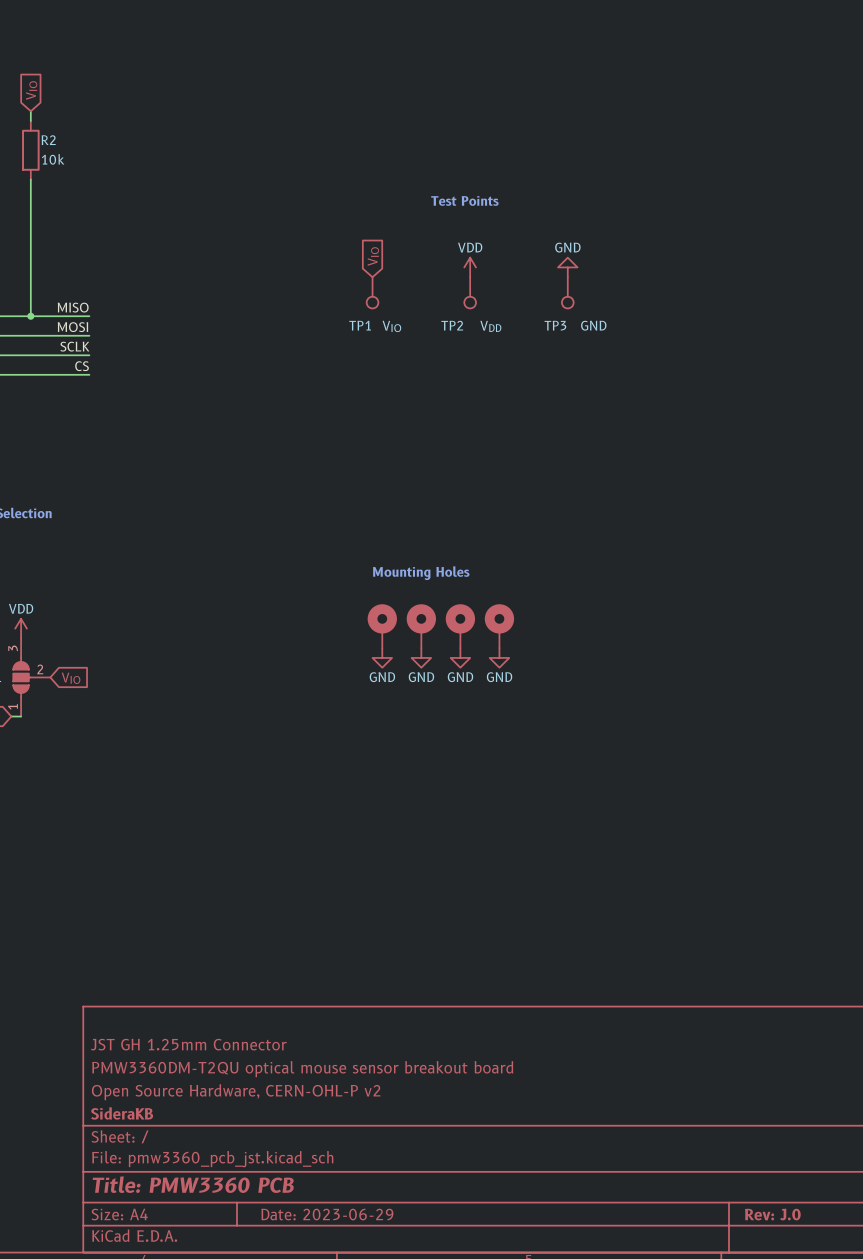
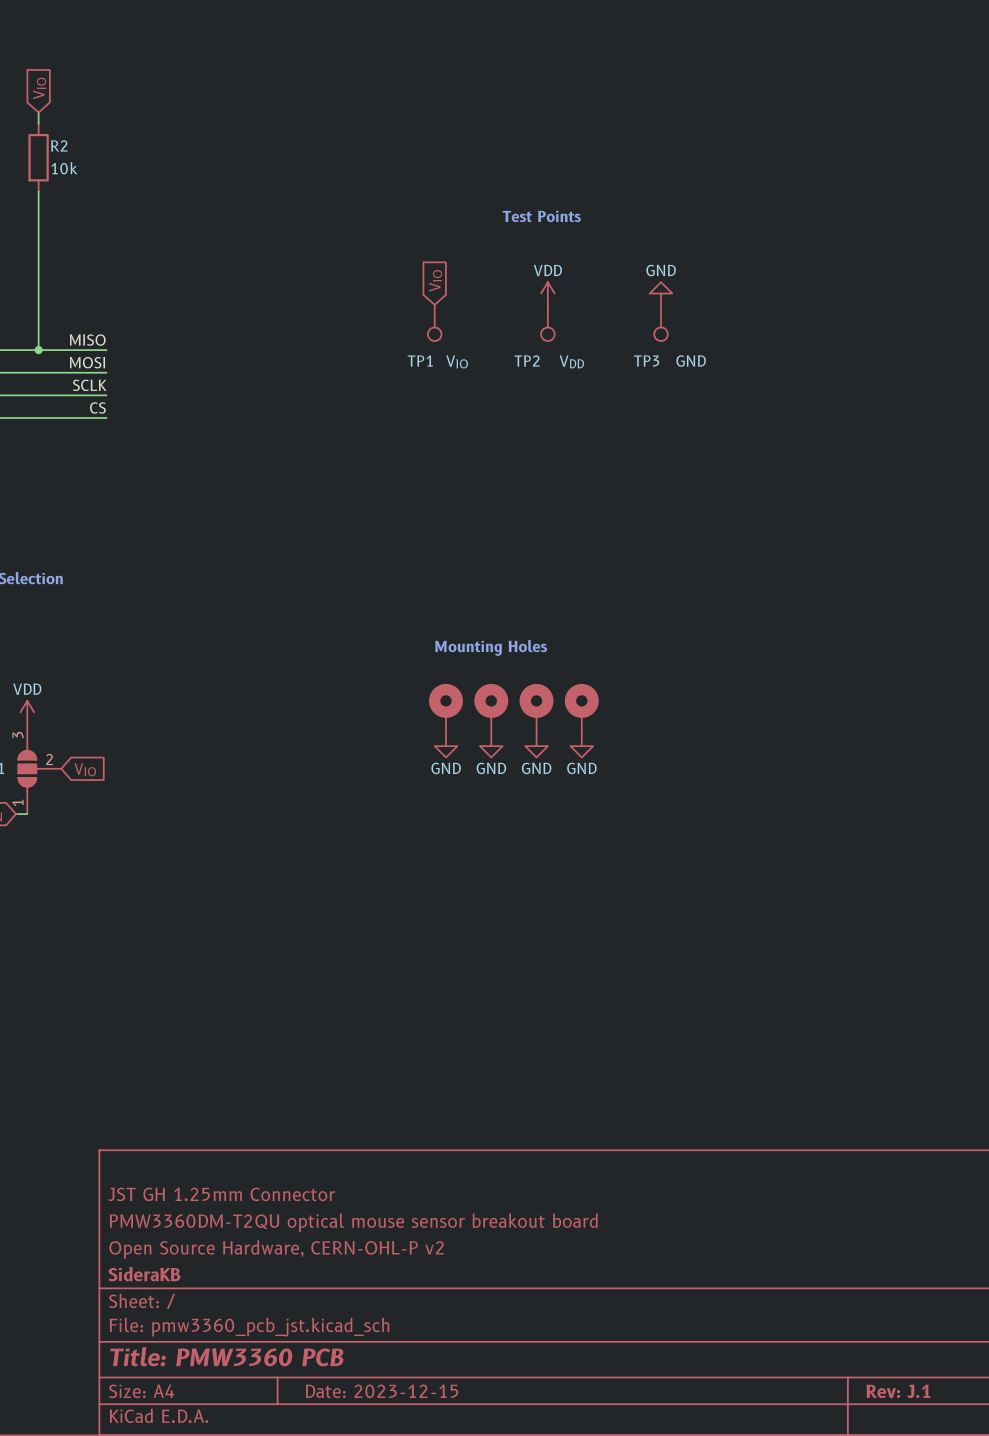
title block: Date: 2023-06-29 (327, 1214) -> Date: 2023-12-15 (382, 1391)
title block: Rev: J.0 (772, 1214) -> Rev: J.1 (898, 1391)

